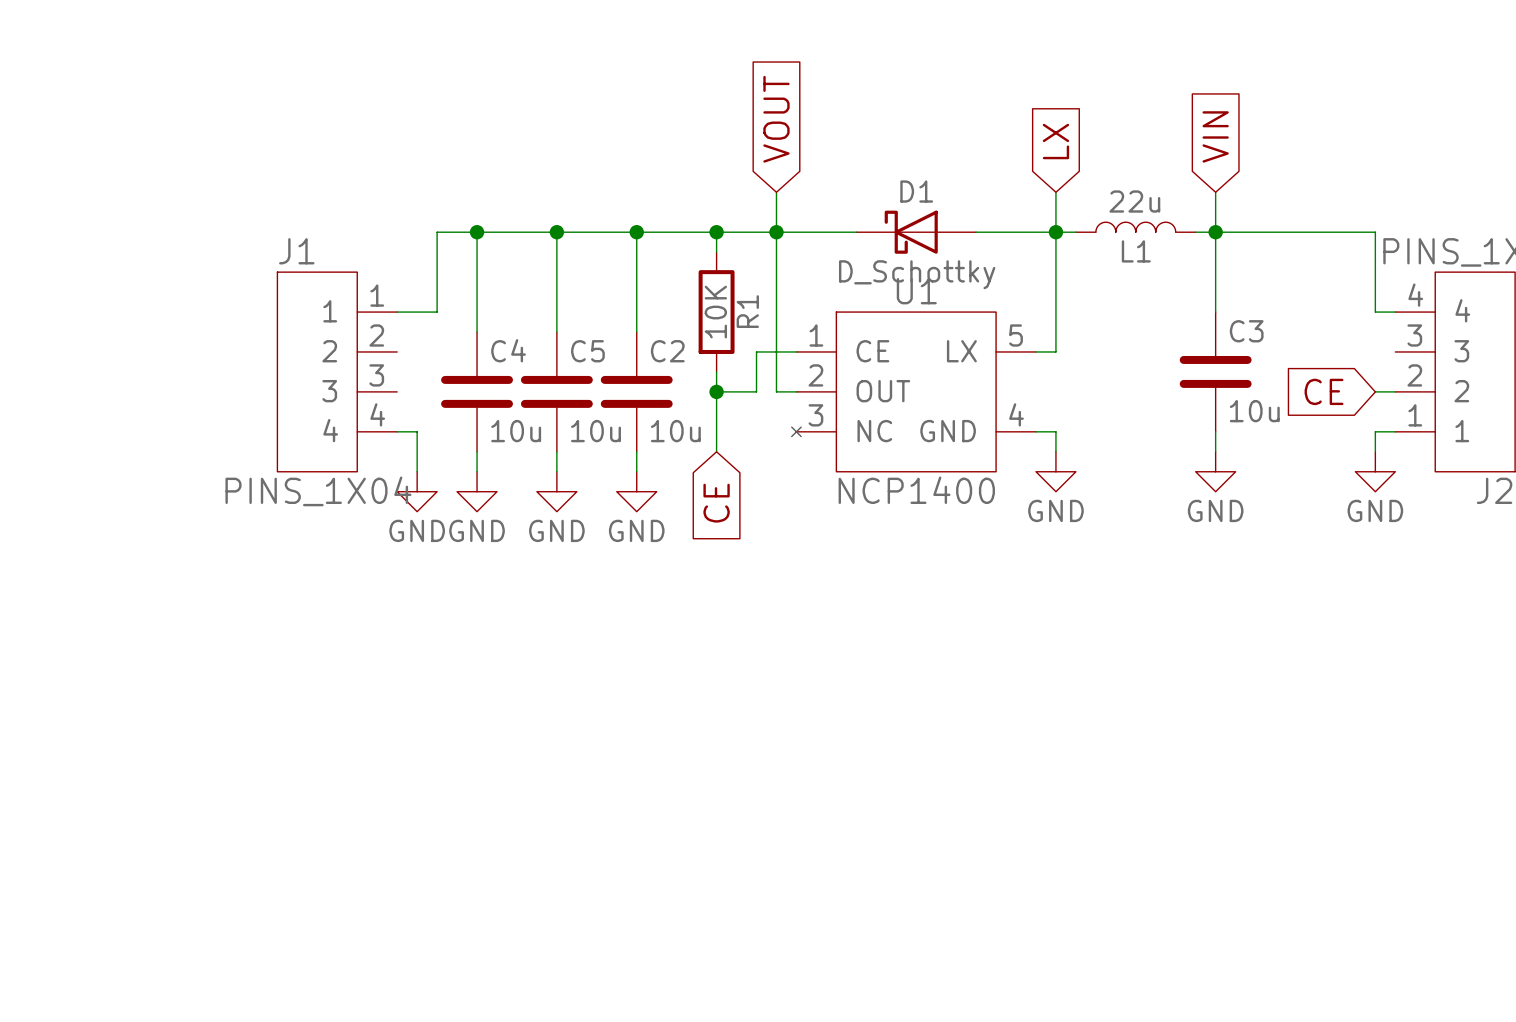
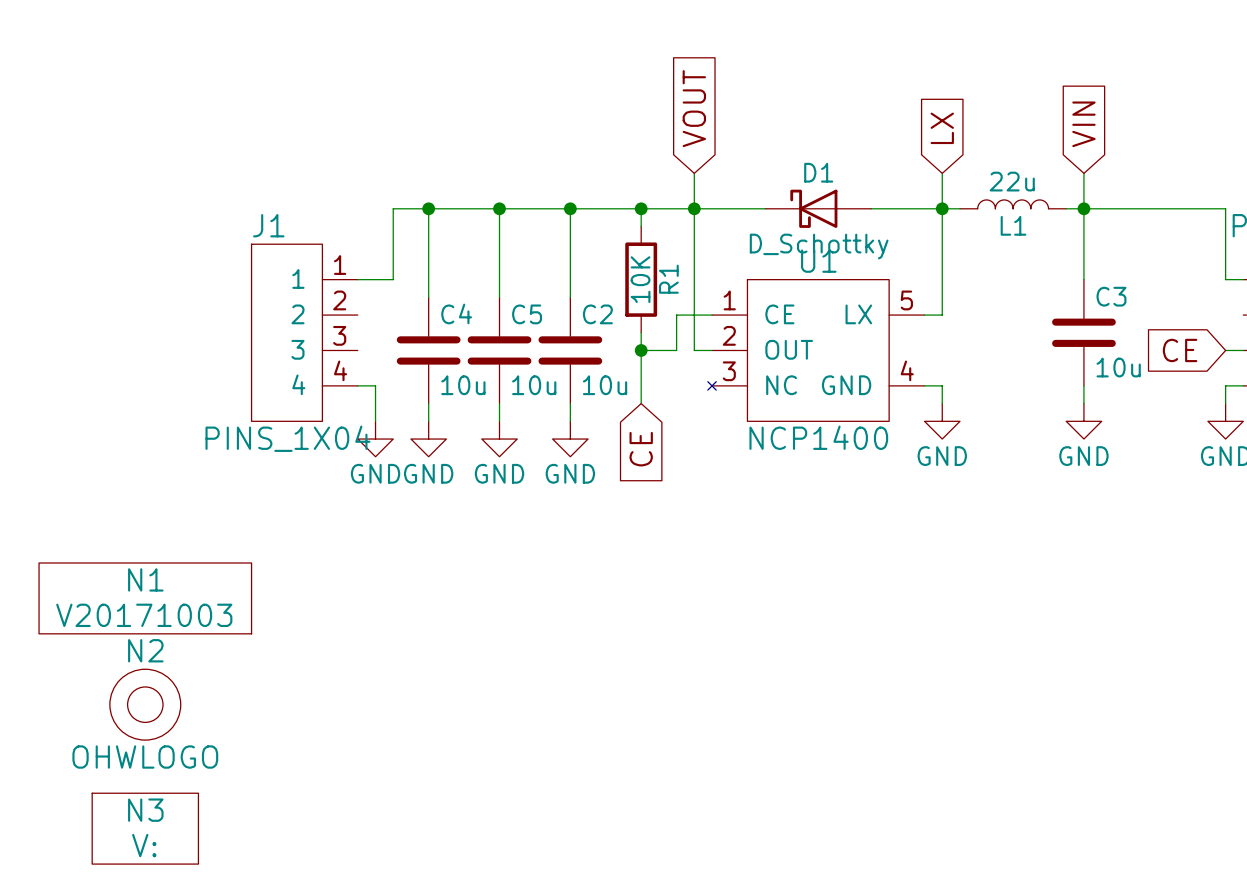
N1: none -> V20171003 (145, 598)
N2: none -> OHWLOGO (145, 704)
N3: none -> V: (145, 828)

